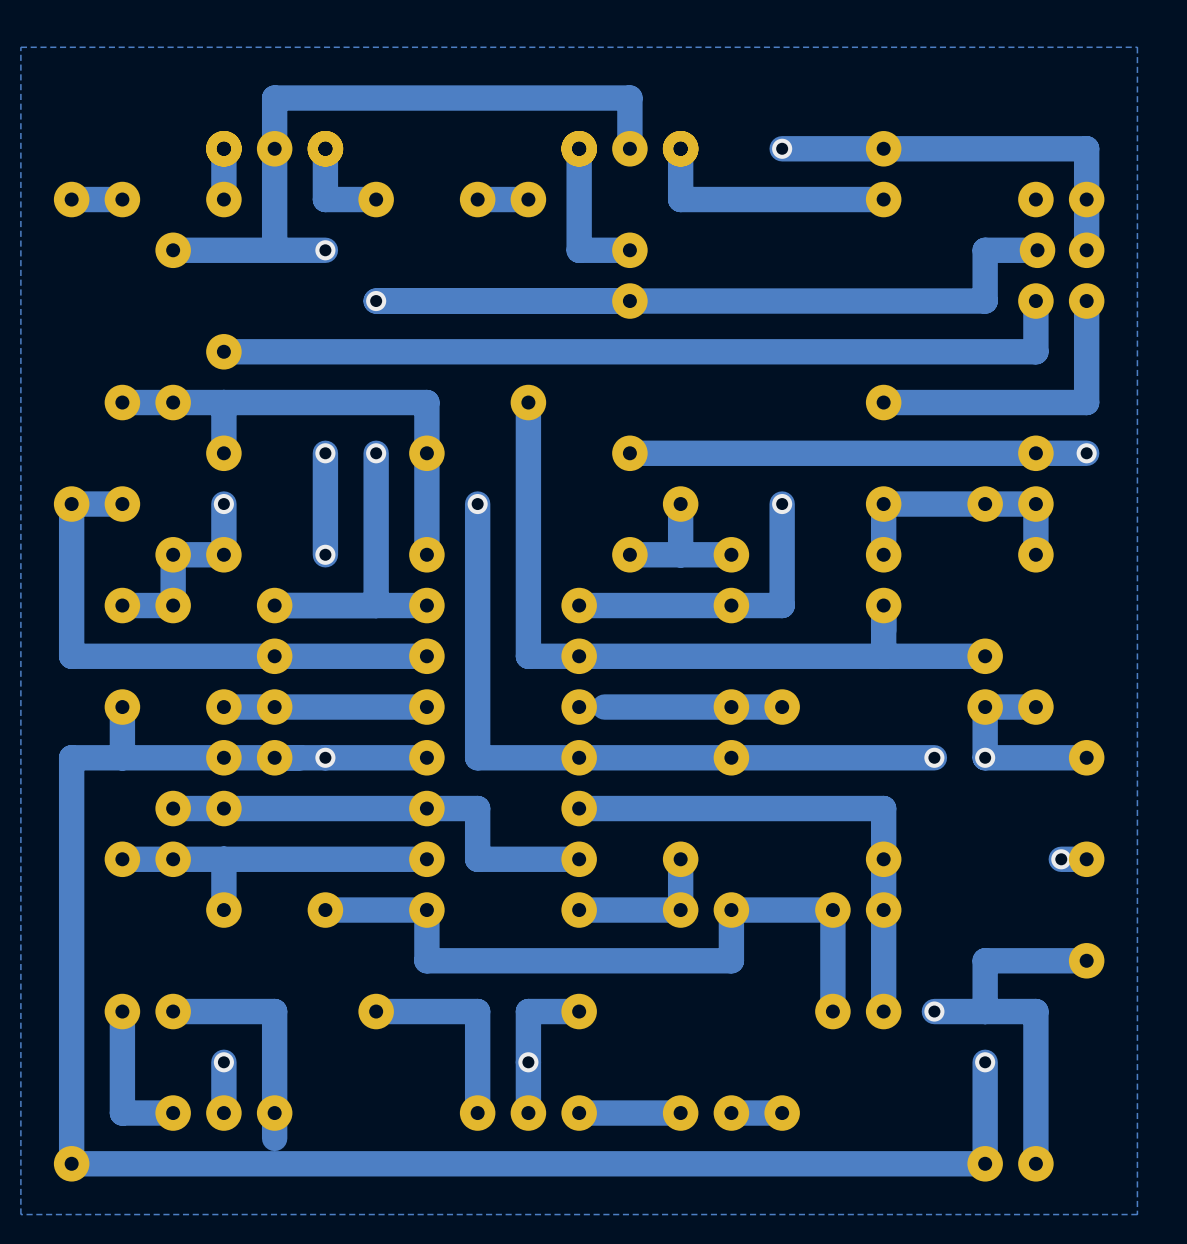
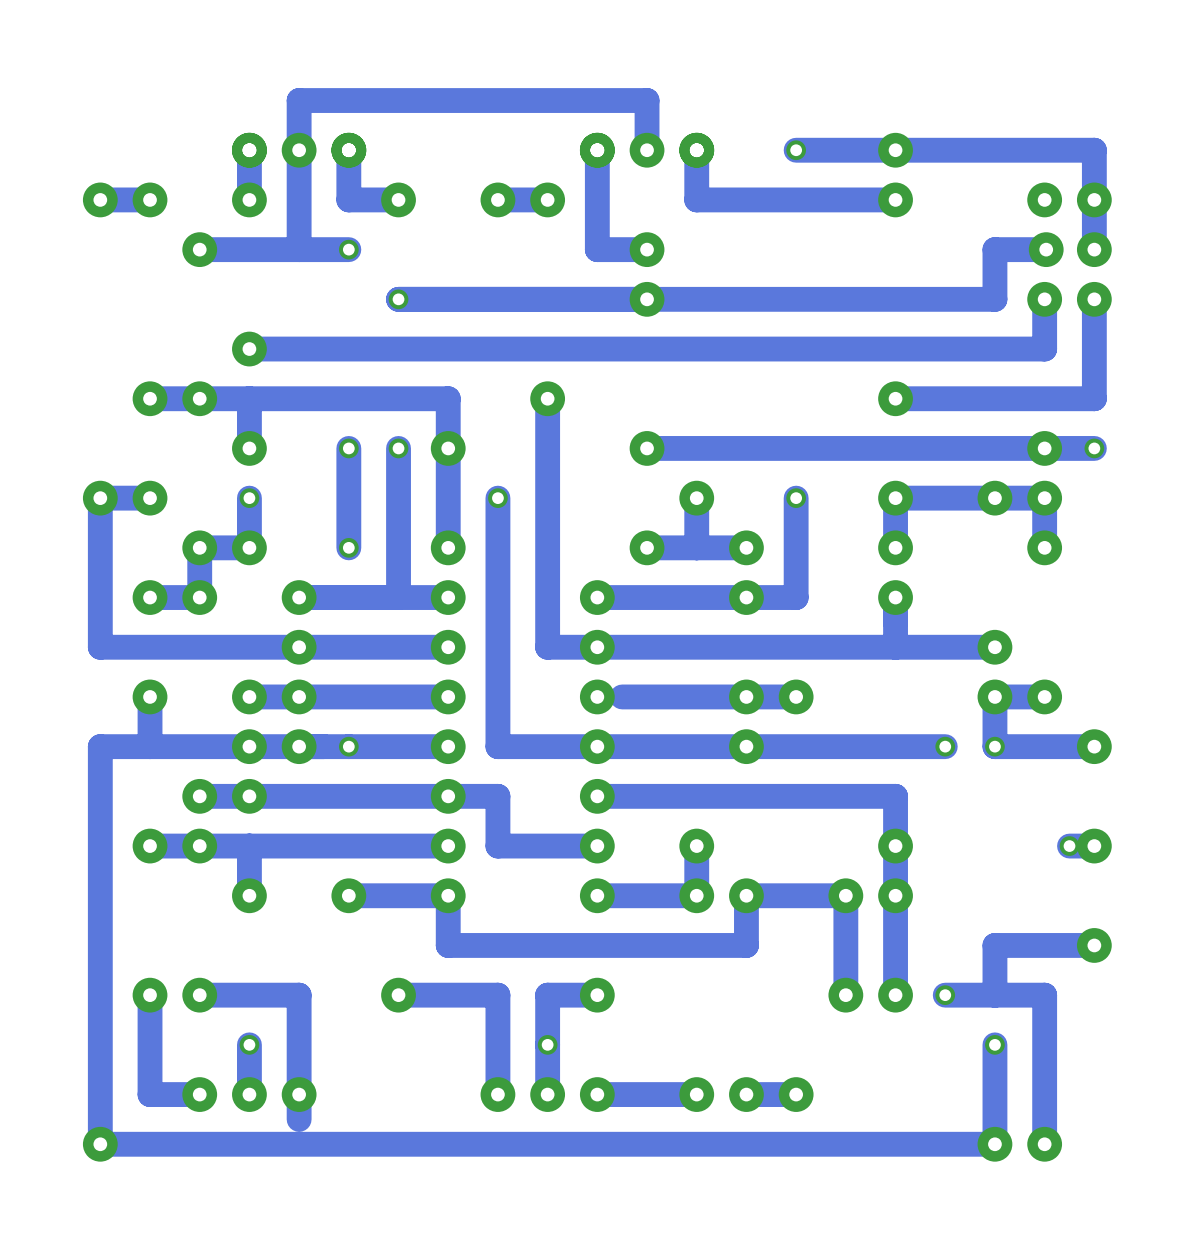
zone outline: (1137, 47) (1137, 1214) (20, 1214) (20, 47) (1137, 47) -> none

